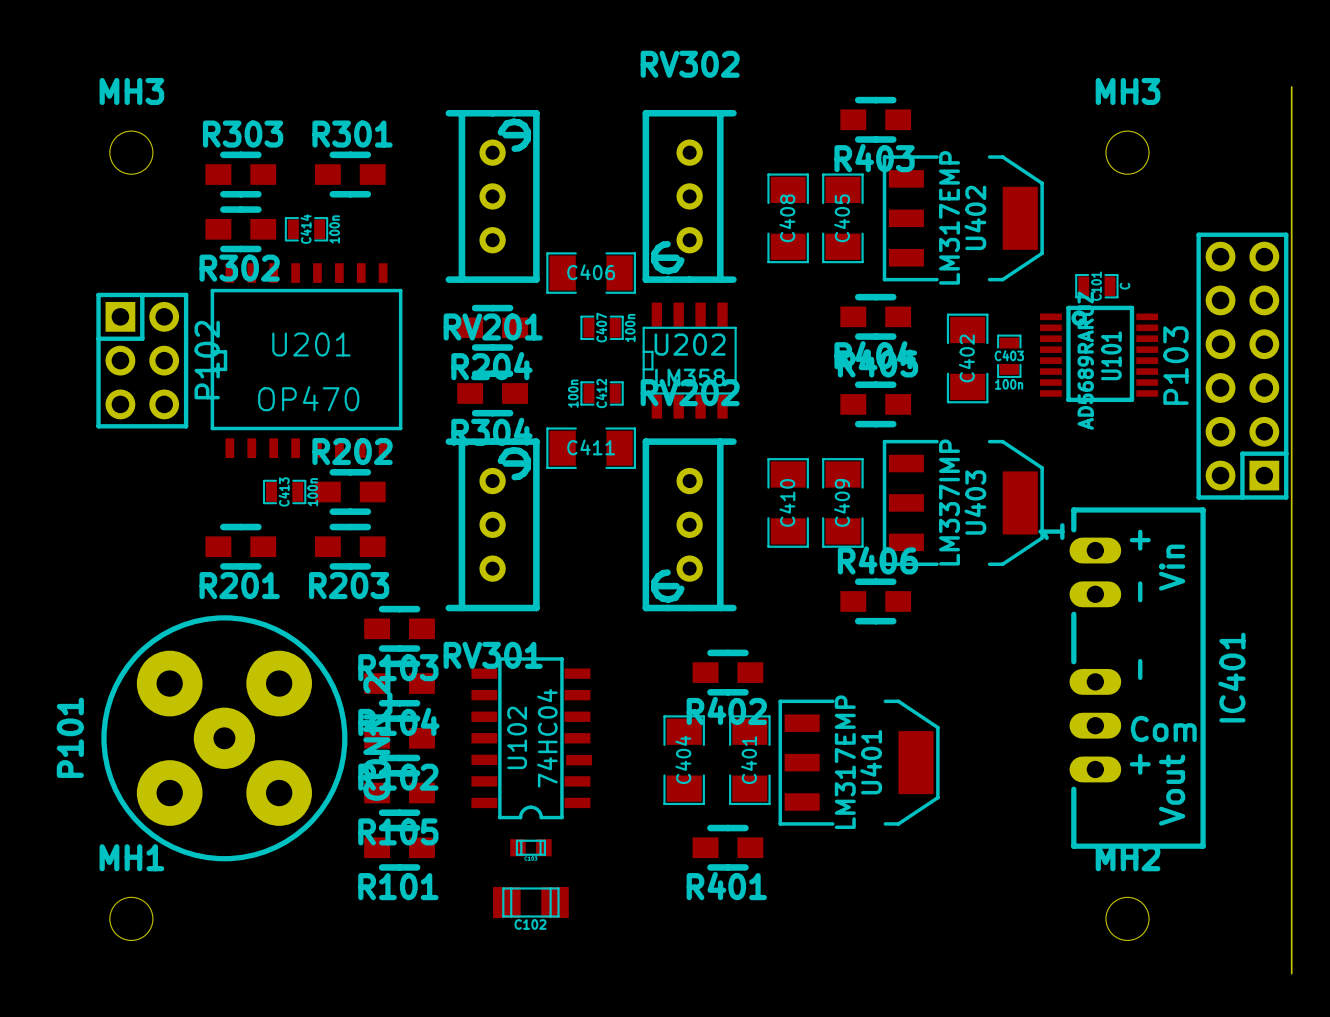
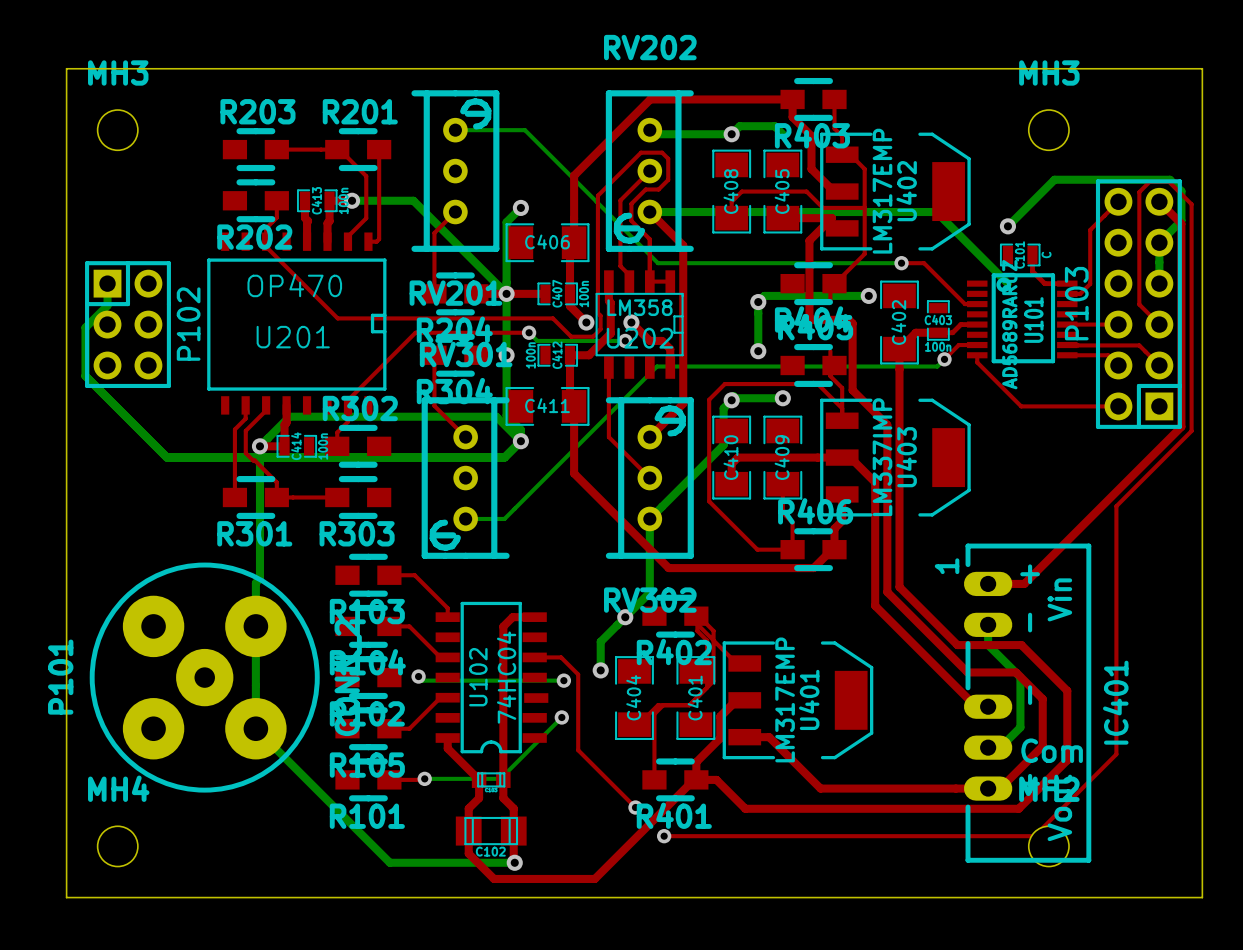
board edge: none -> (1202, 68) (66, 68) (66, 897) (1202, 897)
top track: none -> (834, 99) (834, 128) (842, 136) (842, 154) (850, 154) (864, 169) (864, 254) (830, 288) (830, 302)
R303 name position: R303 (243, 134) -> R303 (357, 533)
R301 name position: R301 (352, 134) -> R301 (254, 533)
bottom track: none -> (455, 130) (524, 130) (658, 263) (901, 263)
bottom track: none -> (649, 130) (653, 134) (731, 134) (739, 126) (774, 126) (782, 134)
via: none -> (731, 134)
top track: none -> (276, 149) (339, 149) (366, 176) (366, 218) (347, 236) (347, 241)
top track: none -> (379, 149) (379, 239) (376, 241) (368, 241)
R303 position: (240, 174) -> (358, 497)
R301 position: (350, 174) -> (255, 497)
RV302 rotation: 0° (689, 196) -> 180° (649, 478)
RV302 position: (689, 196) -> (649, 478)
top track: none -> (649, 171) (620, 200) (620, 266) (629, 275) (629, 281)
top track: none -> (842, 191) (834, 191) (811, 169) (811, 136) (792, 117) (792, 99) (650, 99) (574, 175) (574, 242) (570, 246) (570, 306) (586, 322)
top track: none -> (276, 200) (276, 217) (266, 228) (266, 246) (337, 318) (552, 318) (571, 336) (593, 336) (600, 329) (600, 315) (597, 313) (597, 195) (640, 152) (662, 152) (668, 158) (668, 179) (658, 189) (645, 189) (631, 203) (631, 220) (649, 239) (649, 281) (670, 281)
top track: none -> (305, 200) (305, 218) (308, 221) (307, 241)
top track: none -> (352, 200) (329, 200) (327, 241)
bottom track: none -> (352, 200) (413, 200) (506, 293)
via: none -> (352, 200)
R302 position: (240, 229) -> (358, 446)
C414 position: (306, 229) -> (296, 446)
top track: none -> (1118, 201) (1090, 230) (1090, 283) (1080, 293) (1067, 293)
top track: none -> (1159, 201) (1181, 223) (1181, 426) (1024, 583) (988, 583)
bottom track: none -> (520, 207) (506, 222) (506, 415) (520, 429) (520, 441)
via: none -> (520, 207)
top track: none -> (864, 207) (822, 207) (806, 191) (741, 191) (731, 201) (731, 218)
top track: none -> (455, 212) (434, 232) (434, 293)
top track: none -> (649, 212) (683, 245) (683, 403) (649, 437)
bottom track: none -> (649, 212) (936, 212) (1007, 283)
top track: none -> (782, 218) (831, 218) (809, 240) (809, 317) (811, 319) (848, 319) (852, 323) (852, 390) (887, 424) (887, 592) (967, 672) (1016, 672) (1042, 699) (1042, 746) (1000, 788) (820, 788) (769, 737) (744, 737)
bottom track: none -> (1007, 226) (1054, 179) (1169, 179) (1181, 191) (1181, 220) (1159, 242) (1159, 283)
via: none -> (1007, 226)
R302 name position: R302 (239, 268) -> R302 (360, 408)
top track: none -> (1032, 254) (1032, 271) (1044, 283) (1067, 283)
top track: none -> (901, 263) (924, 263) (964, 304) (977, 304)
via: none -> (901, 263)
top track: none -> (608, 281) (610, 333) (589, 355) (570, 355) (570, 402) (574, 406) (574, 473) (668, 568) (813, 568) (832, 549) (834, 549) (834, 528) (842, 521) (842, 494)
bottom track: none -> (107, 283) (107, 305) (85, 327) (85, 376) (166, 457) (504, 457) (520, 441)
top track: none -> (476, 293) (545, 293)
via: none -> (506, 293)
bottom track: none -> (868, 295) (764, 295) (758, 302) (758, 351)
via: none -> (868, 295)
via: none -> (758, 302)
via: none -> (586, 322)
top track: none -> (631, 322) (649, 340) (662, 340) (670, 349) (670, 367)
via: none -> (631, 322)
U201 rotation: 0° (306, 360) -> 180° (296, 323)
U202 rotation: 0° (689, 360) -> 180° (639, 324)
top track: none -> (977, 324) (960, 324) (952, 332) (915, 332) (899, 349) (899, 587) (957, 645) (1021, 645) (1067, 690) (1067, 760) (1018, 808) (745, 808) (716, 779) (693, 779) (594, 878) (494, 878) (468, 853) (468, 808) (479, 798) (479, 779) (447, 748) (447, 738)
top track: none -> (1067, 324) (1118, 324)
top track: none -> (1159, 324) (1139, 304) (1139, 192) (1149, 181) (1169, 181) (1191, 204) (1191, 431) (1116, 506) (1116, 754) (1034, 836) (664, 836)
P103 position: (1242, 366) -> (1138, 304)
top track: none -> (529, 332) (415, 332) (347, 400) (347, 421) (337, 432) (337, 446)
bottom track: none -> (529, 332) (537, 340) (625, 340)
via: none -> (529, 332)
via: none -> (625, 340)
top track: none -> (977, 345) (958, 345) (944, 359)
top track: none -> (1067, 345) (1139, 345) (1159, 365)
via: none -> (758, 351)
top track: none -> (830, 351) (830, 376) (842, 388) (842, 420)
top track: none -> (434, 355) (434, 405) (465, 437)
via: none -> (506, 355)
top track: none -> (977, 355) (977, 362) (1021, 406) (1118, 406)
top track: none -> (1067, 355) (1108, 355) (1118, 365)
bottom track: none -> (944, 359) (937, 366) (656, 366) (504, 518) (465, 518)
via: none -> (944, 359)
top track: none -> (608, 367) (608, 437) (649, 478)
bottom track: none -> (733, 396) (735, 398) (782, 398)
bottom track: none -> (734, 397) (723, 408) (723, 445) (649, 518) (649, 592) (600, 641) (600, 670)
via: none -> (782, 398)
via: none -> (731, 400)
top track: none -> (245, 405) (245, 418) (234, 429) (234, 497)
top track: none -> (266, 405) (266, 410) (245, 430) (245, 453) (276, 482) (276, 497) (337, 497)
top track: none -> (286, 405) (284, 446) (259, 446)
top track: none -> (842, 408) (817, 384) (724, 384) (709, 399) (709, 501) (757, 549) (792, 549) (792, 522) (782, 512) (782, 484)
R202 name position: R202 (352, 451) -> R202 (254, 237)
bottom track: none -> (520, 441) (496, 416) (289, 416) (259, 446) (259, 578) (255, 583) (255, 728) (389, 862) (514, 862)
via: none -> (520, 441)
via: none -> (259, 446)
C413 position: (284, 491) -> (317, 200)
R202 position: (350, 491) -> (255, 200)
RV301 rotation: 0° (492, 524) -> 180° (465, 478)
RV202 position: (689, 524) -> (649, 171)
top track: none -> (731, 484) (731, 463) (737, 457) (850, 457) (875, 482) (875, 605) (976, 706) (988, 706)
R201 position: (240, 546) -> (358, 149)
R203 position: (350, 546) -> (255, 149)
R201 name position: R201 (239, 585) -> R201 (360, 111)
R203 name position: R203 (349, 585) -> R203 (257, 111)
top track: none -> (389, 575) (414, 575) (447, 608) (447, 617)
top track: none -> (534, 617) (512, 617) (503, 626) (503, 798) (513, 808) (514, 862)
via: none -> (625, 617)
IC401 position: (1137, 678) -> (1027, 703)
top track: none -> (697, 624) (736, 663) (744, 663)
bottom track: none -> (988, 624) (988, 645) (1020, 677) (1020, 727) (1000, 747) (988, 747)
top track: none -> (389, 626) (409, 626) (440, 657) (447, 657)
top track: none -> (534, 657) (561, 657) (578, 674) (578, 750) (635, 807)
via: none -> (600, 670)
bottom track: none -> (418, 676) (422, 680) (563, 680)
via: none -> (418, 676)
via: none -> (563, 680)
top track: none -> (707, 687) (707, 640) (697, 630) (697, 617) (699, 617) (713, 630) (713, 681) (689, 705) (658, 705) (639, 723) (635, 723)
top track: none -> (447, 697) (440, 697) (409, 728) (389, 728)
top track: none -> (744, 700) (736, 700) (720, 716) (720, 738) (696, 762) (696, 779)
top track: none -> (663, 705) (654, 714) (654, 779)
bottom track: none -> (561, 717) (500, 778) (424, 778)
via: none -> (561, 717)
top track: none -> (424, 778) (389, 779)
via: none -> (424, 778)
MH1 name: MH1 (131, 857) -> MH4 (118, 788)
via: none -> (635, 807)
via: none -> (664, 836)
via: none -> (514, 862)

